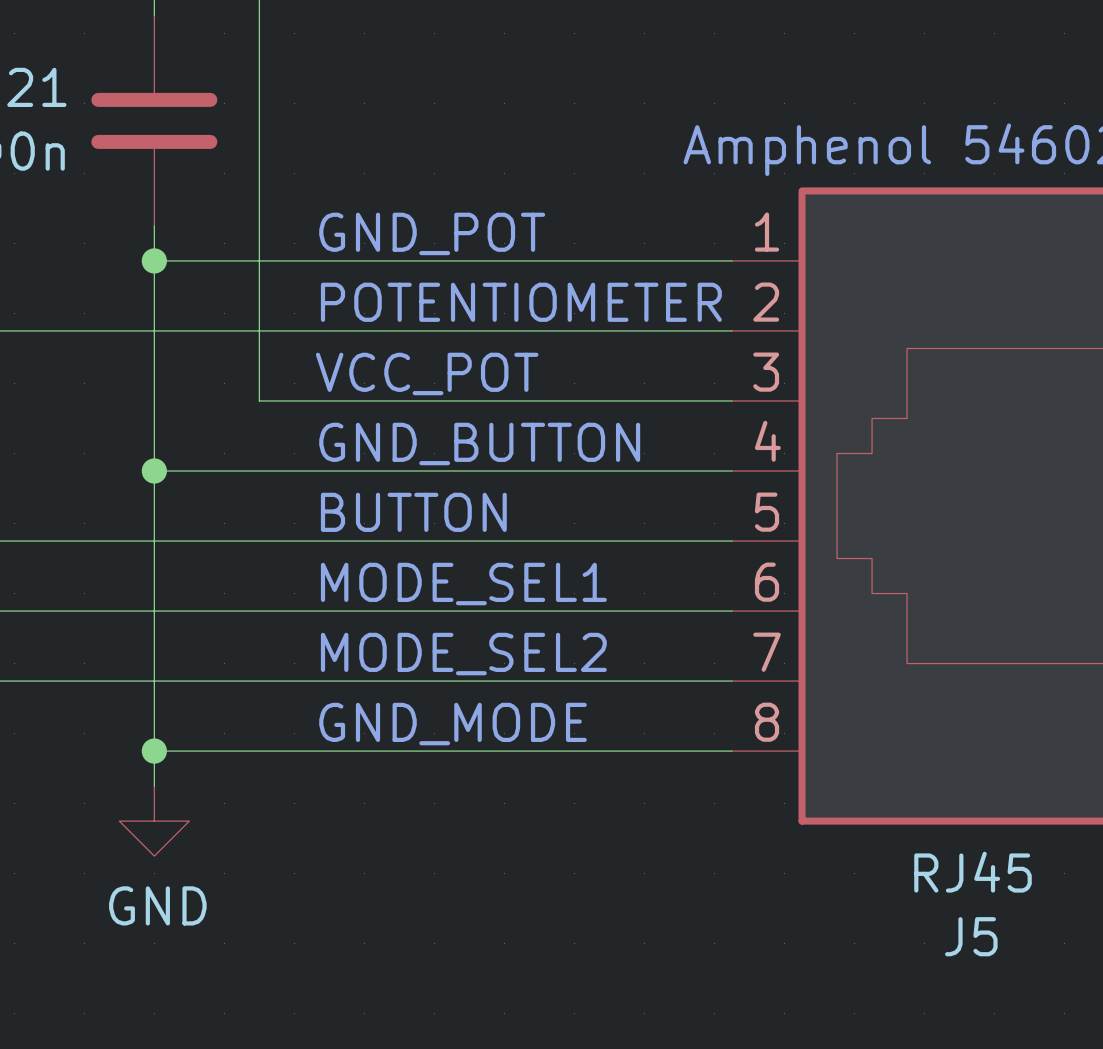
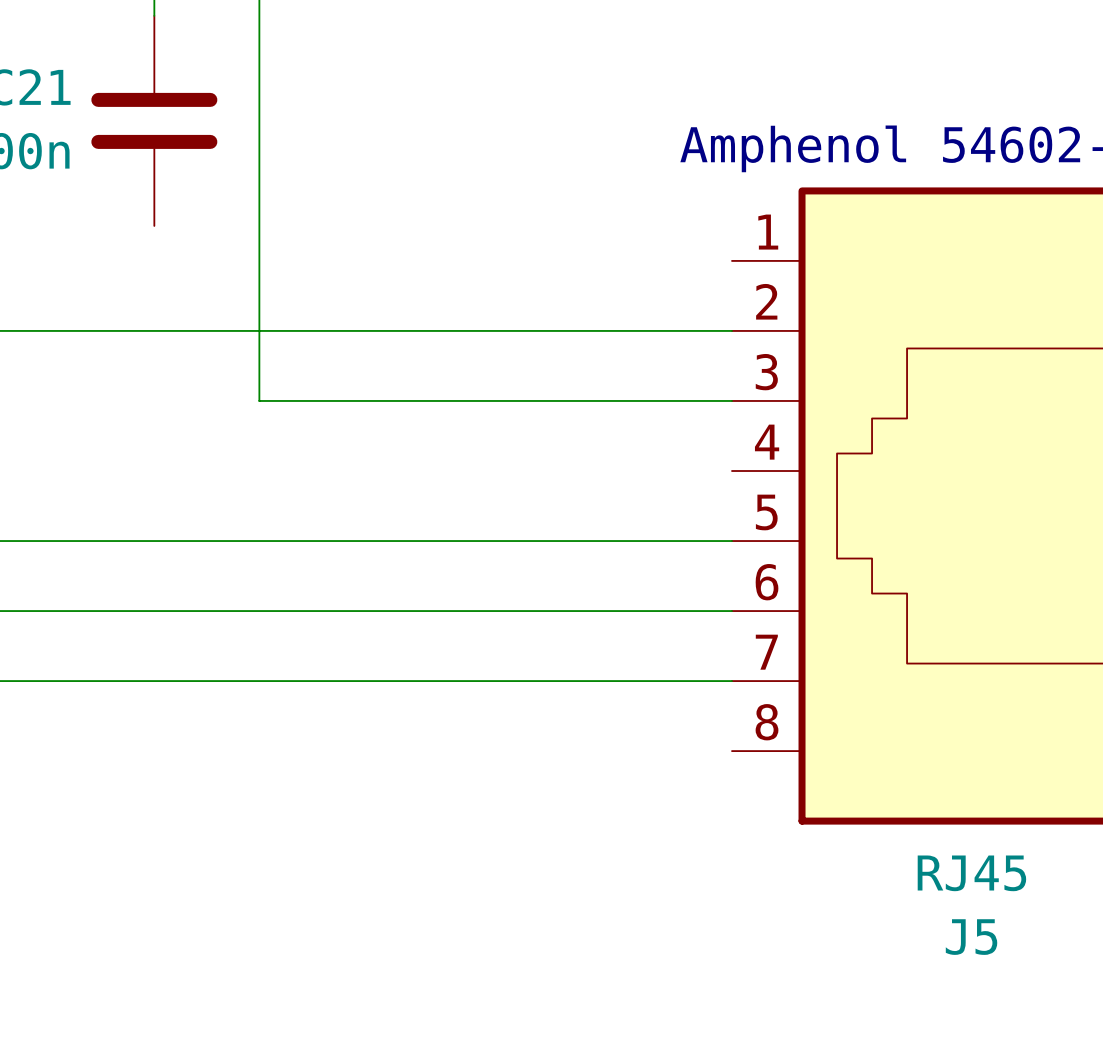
wire: (154, 225) (154, 786) -> none
text: GND_POT (432, 233) -> none
wire: (154, 260) (732, 260) -> none
junction: (154, 260) -> none
text: POTENTIOMETER (521, 302) -> none
text: VCC_POT (427, 373) -> none
text: GND_BUTTON (479, 443) -> none
wire: (154, 471) (732, 471) -> none
junction: (154, 471) -> none
text: BUTTON (413, 512) -> none
text: MODE_SEL1 (463, 584) -> none
text: MODE_SEL2 (463, 654) -> none
text: GND_MODE (453, 724) -> none
wire: (154, 751) (732, 751) -> none
junction: (154, 751) -> none
power symbol: GND (154, 821) -> none

